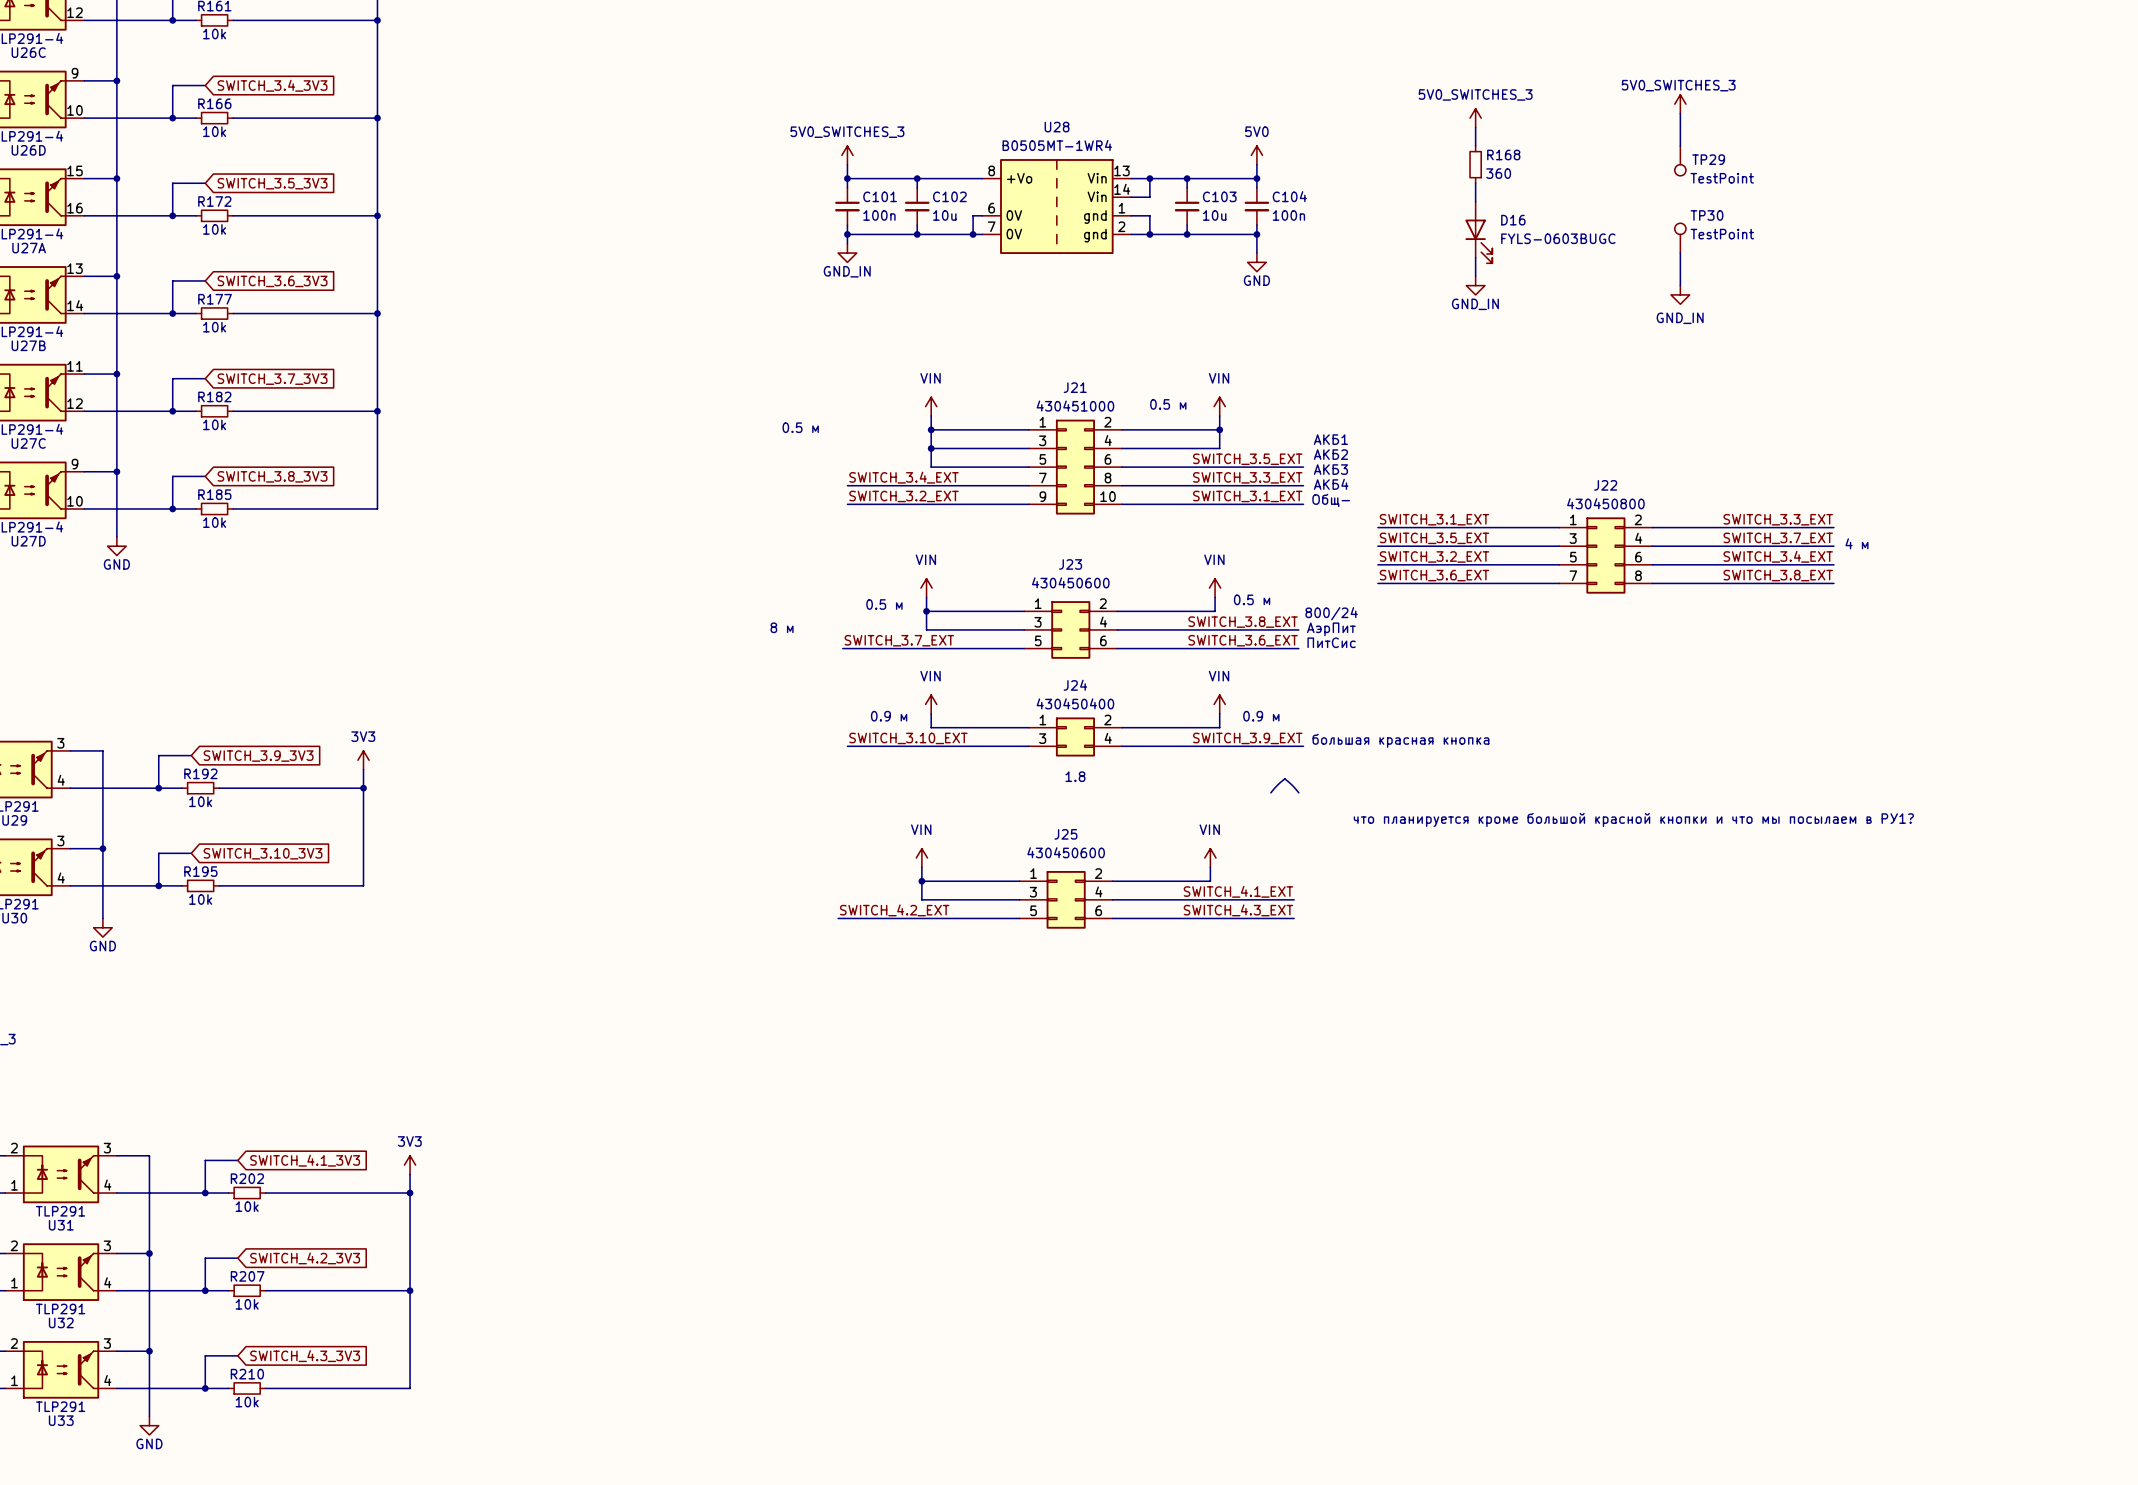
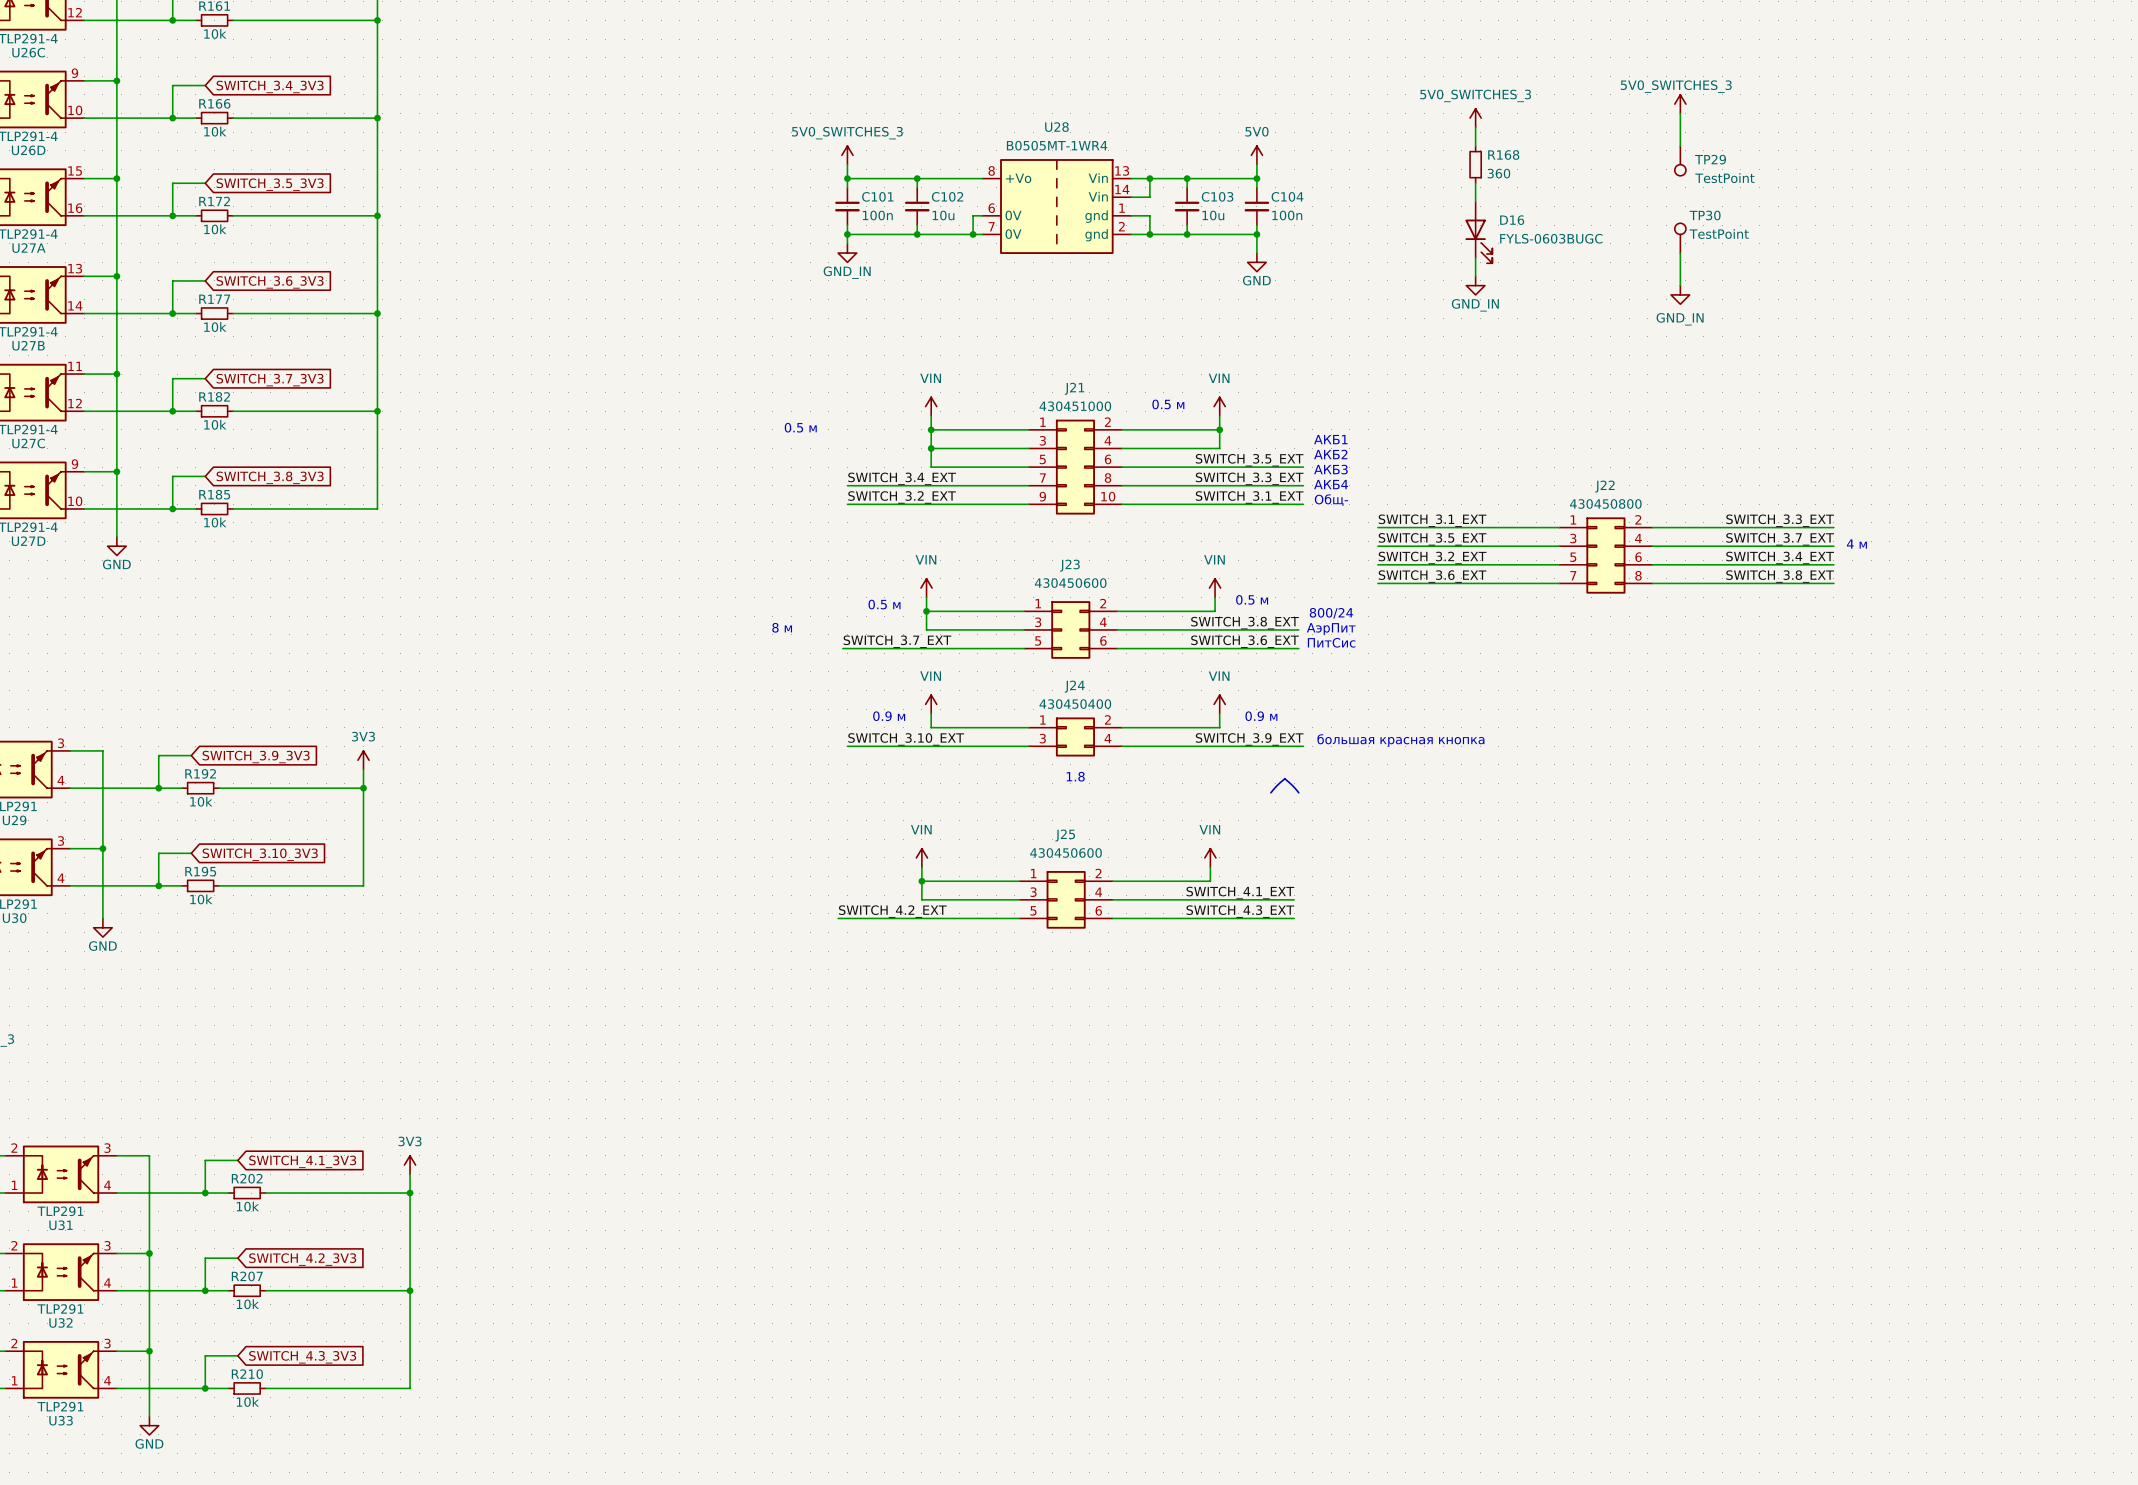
text: что планируется кроме большой красной кнопки и что мы посылаем в РУ1? (1633, 819) -> none

